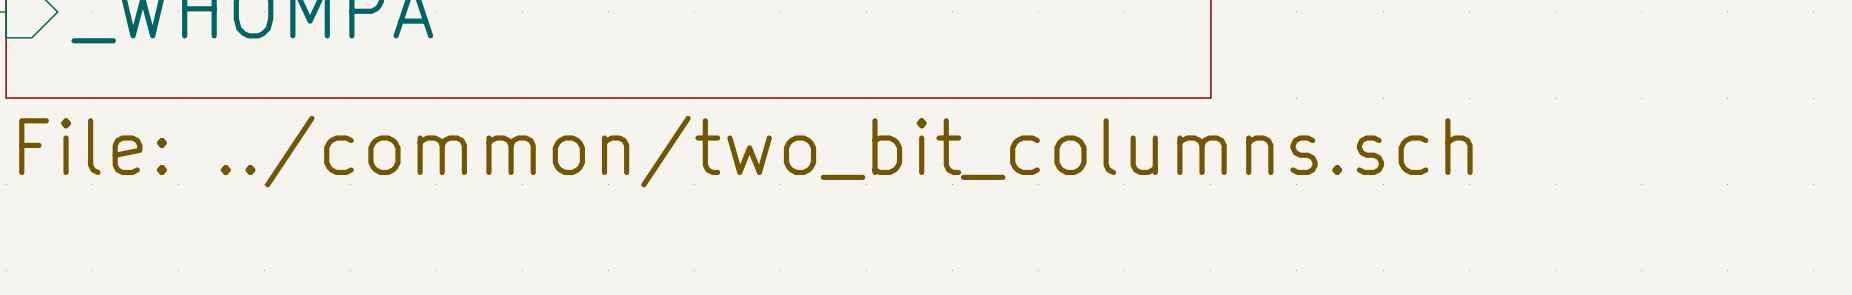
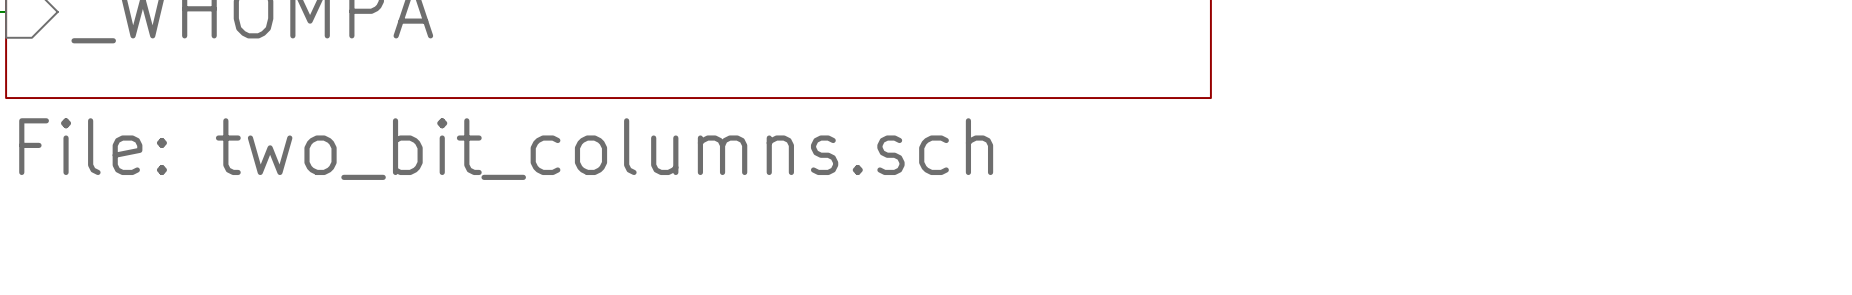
sheet value: File: ../common/two_bit_columns.sch (745, 151) -> File: two_bit_columns.sch (506, 149)

